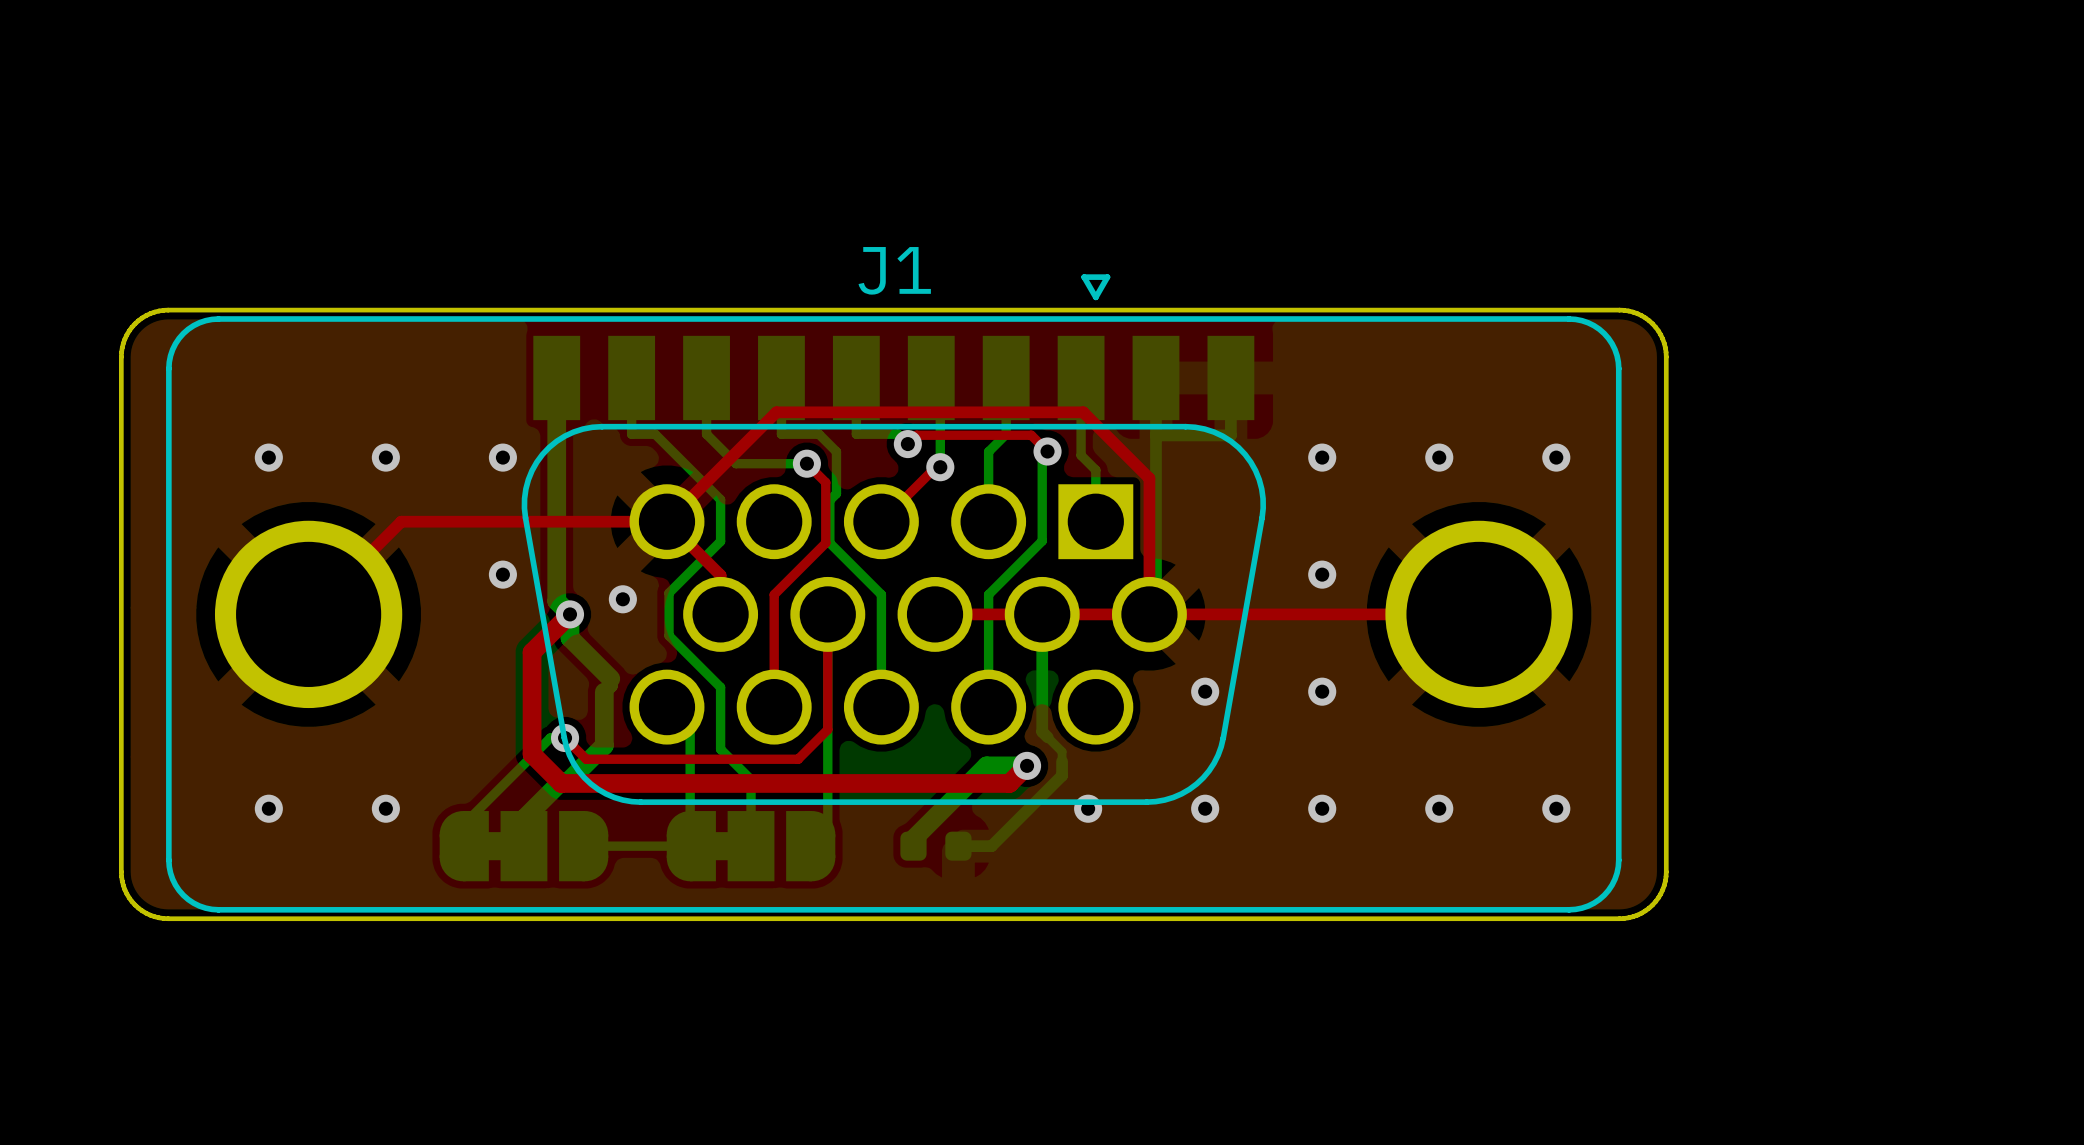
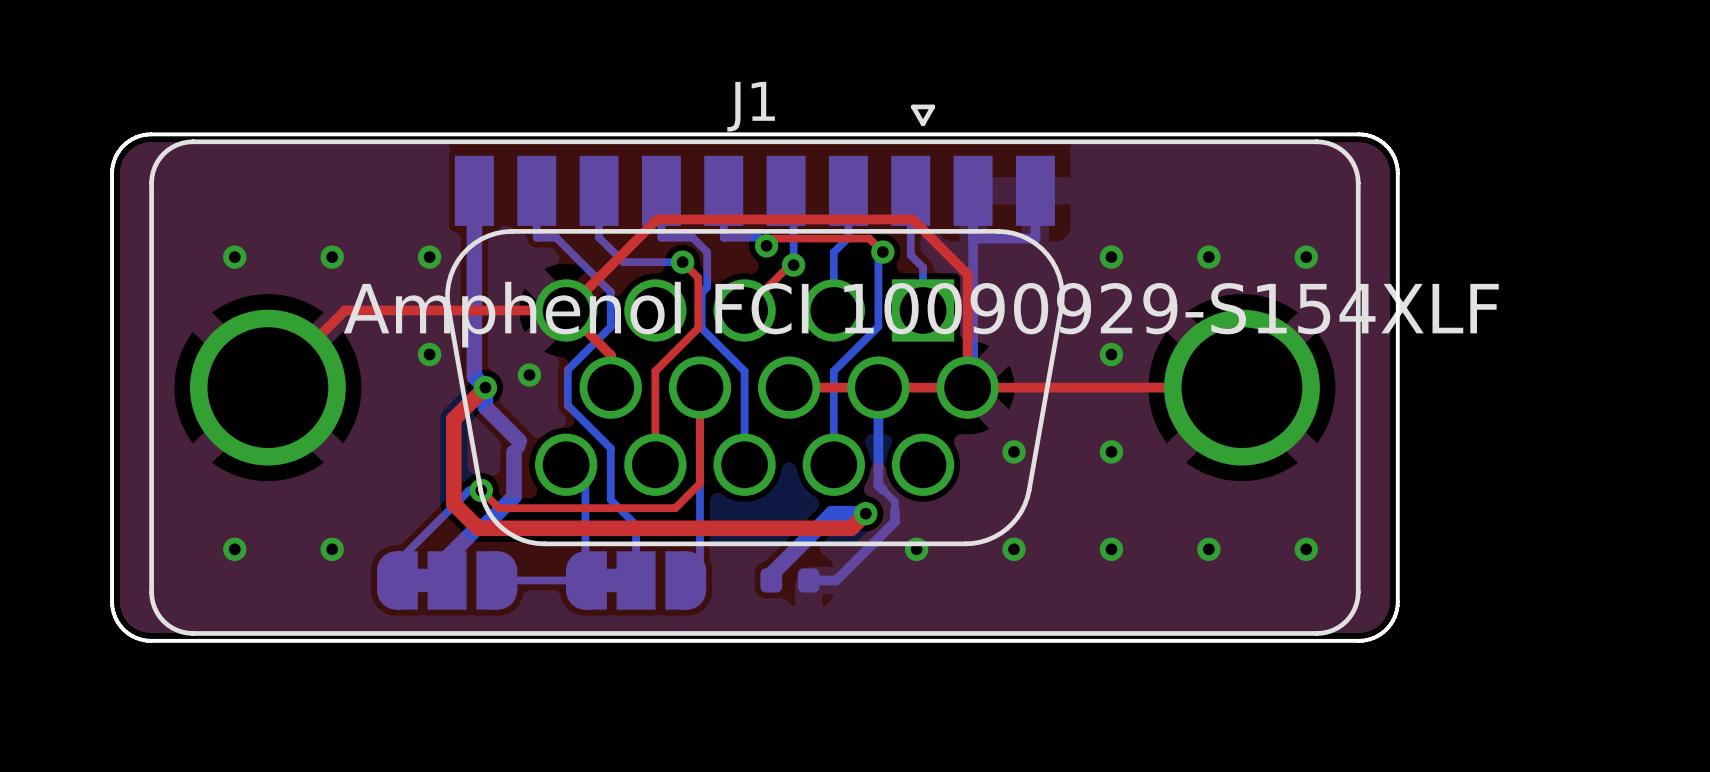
J1 text: none -> Amphenol FCI 10090929-S154XLF (921, 314)

